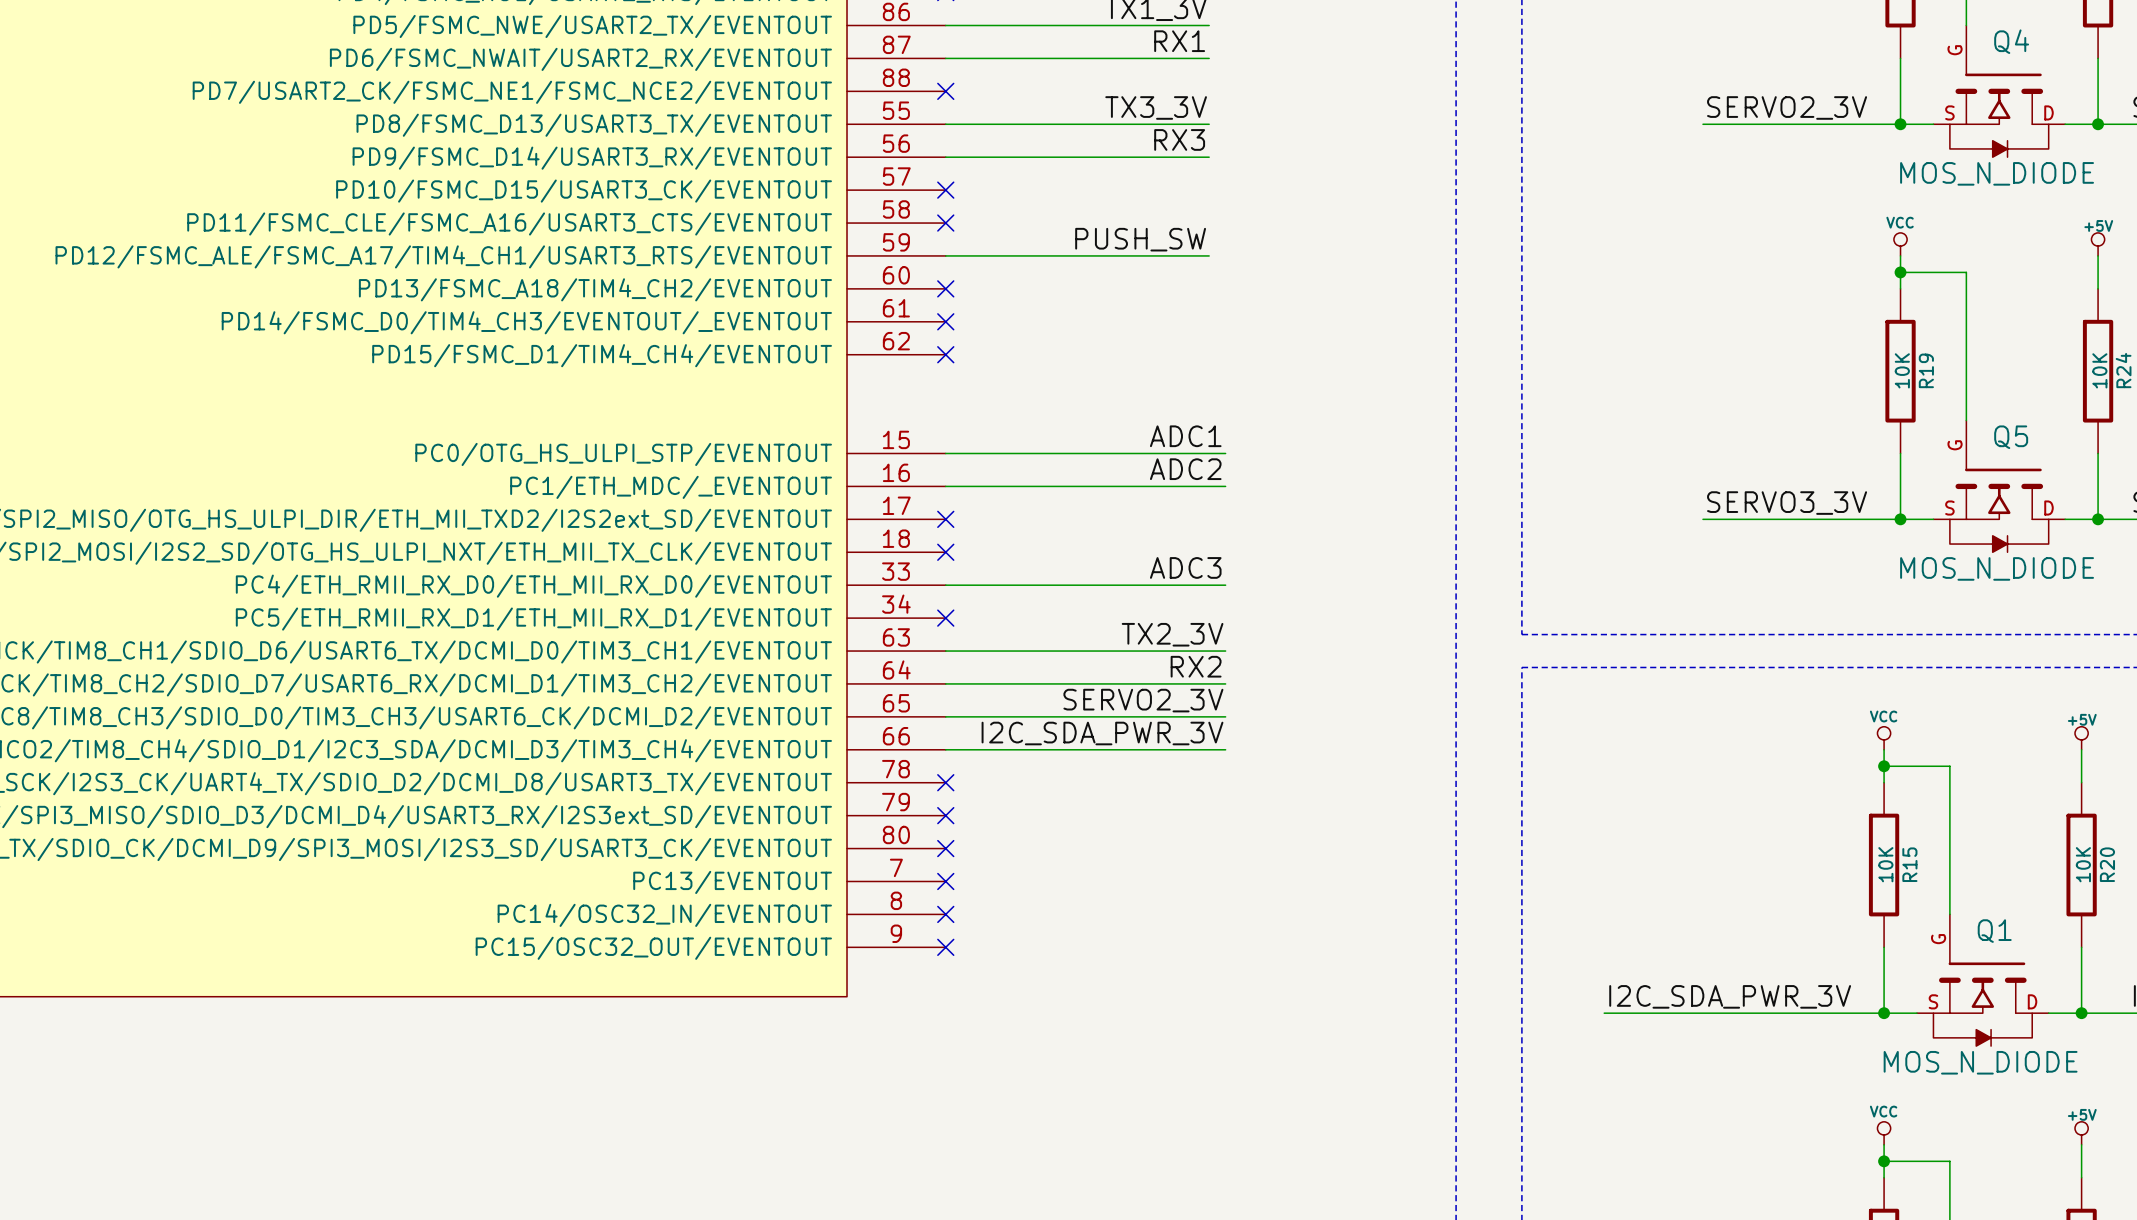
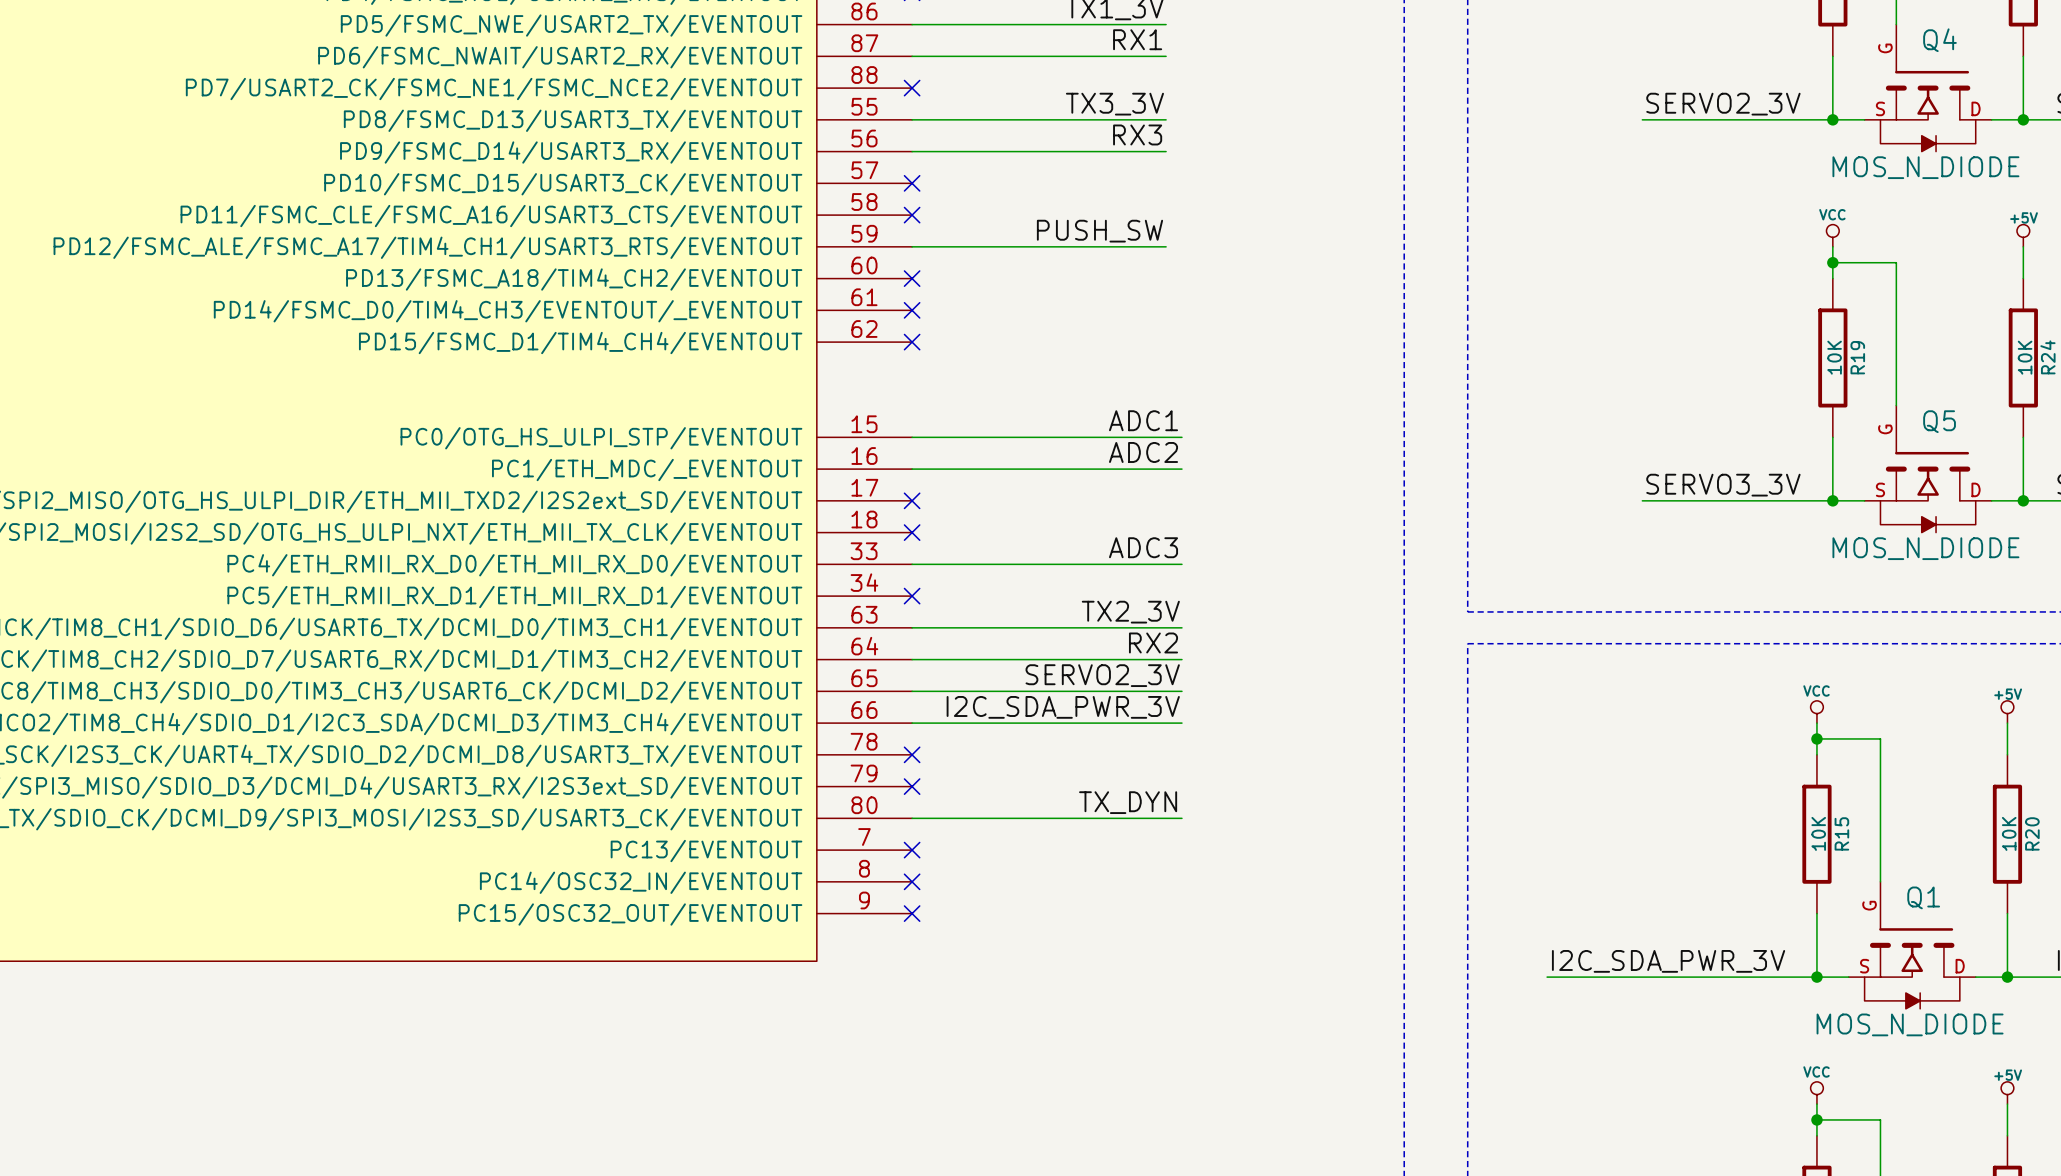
label: none -> TX_DYN (1128, 802)
wire: none -> (912, 818) (1181, 818)
no-connect mark: (945, 848) -> none

